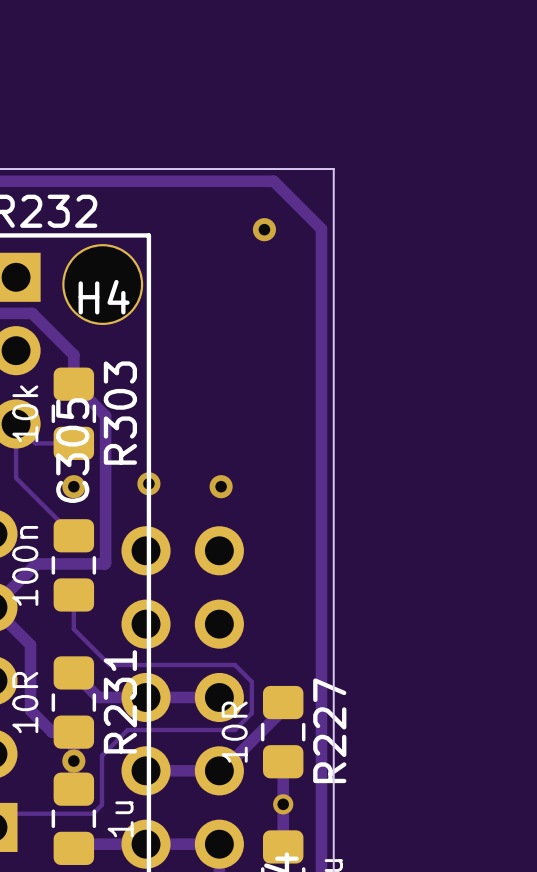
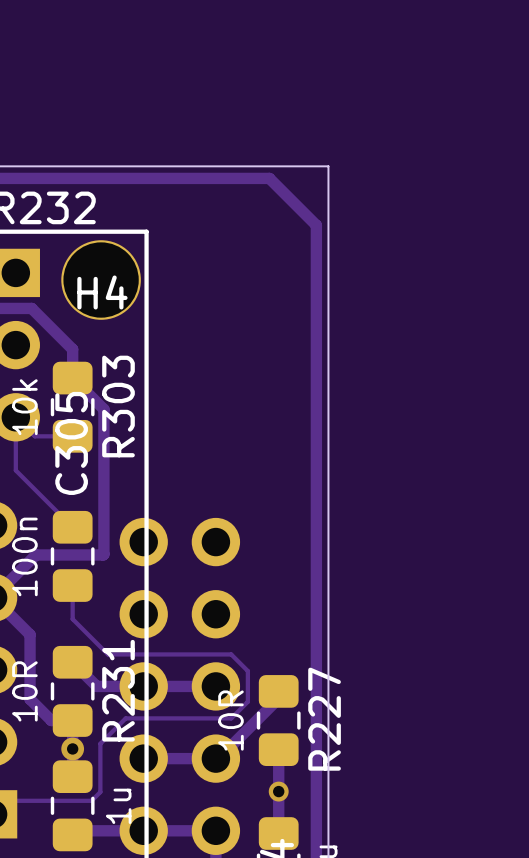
via: (264, 229) -> none
via: (148, 483) -> none
via: (73, 486) -> none
via: (221, 486) -> none

